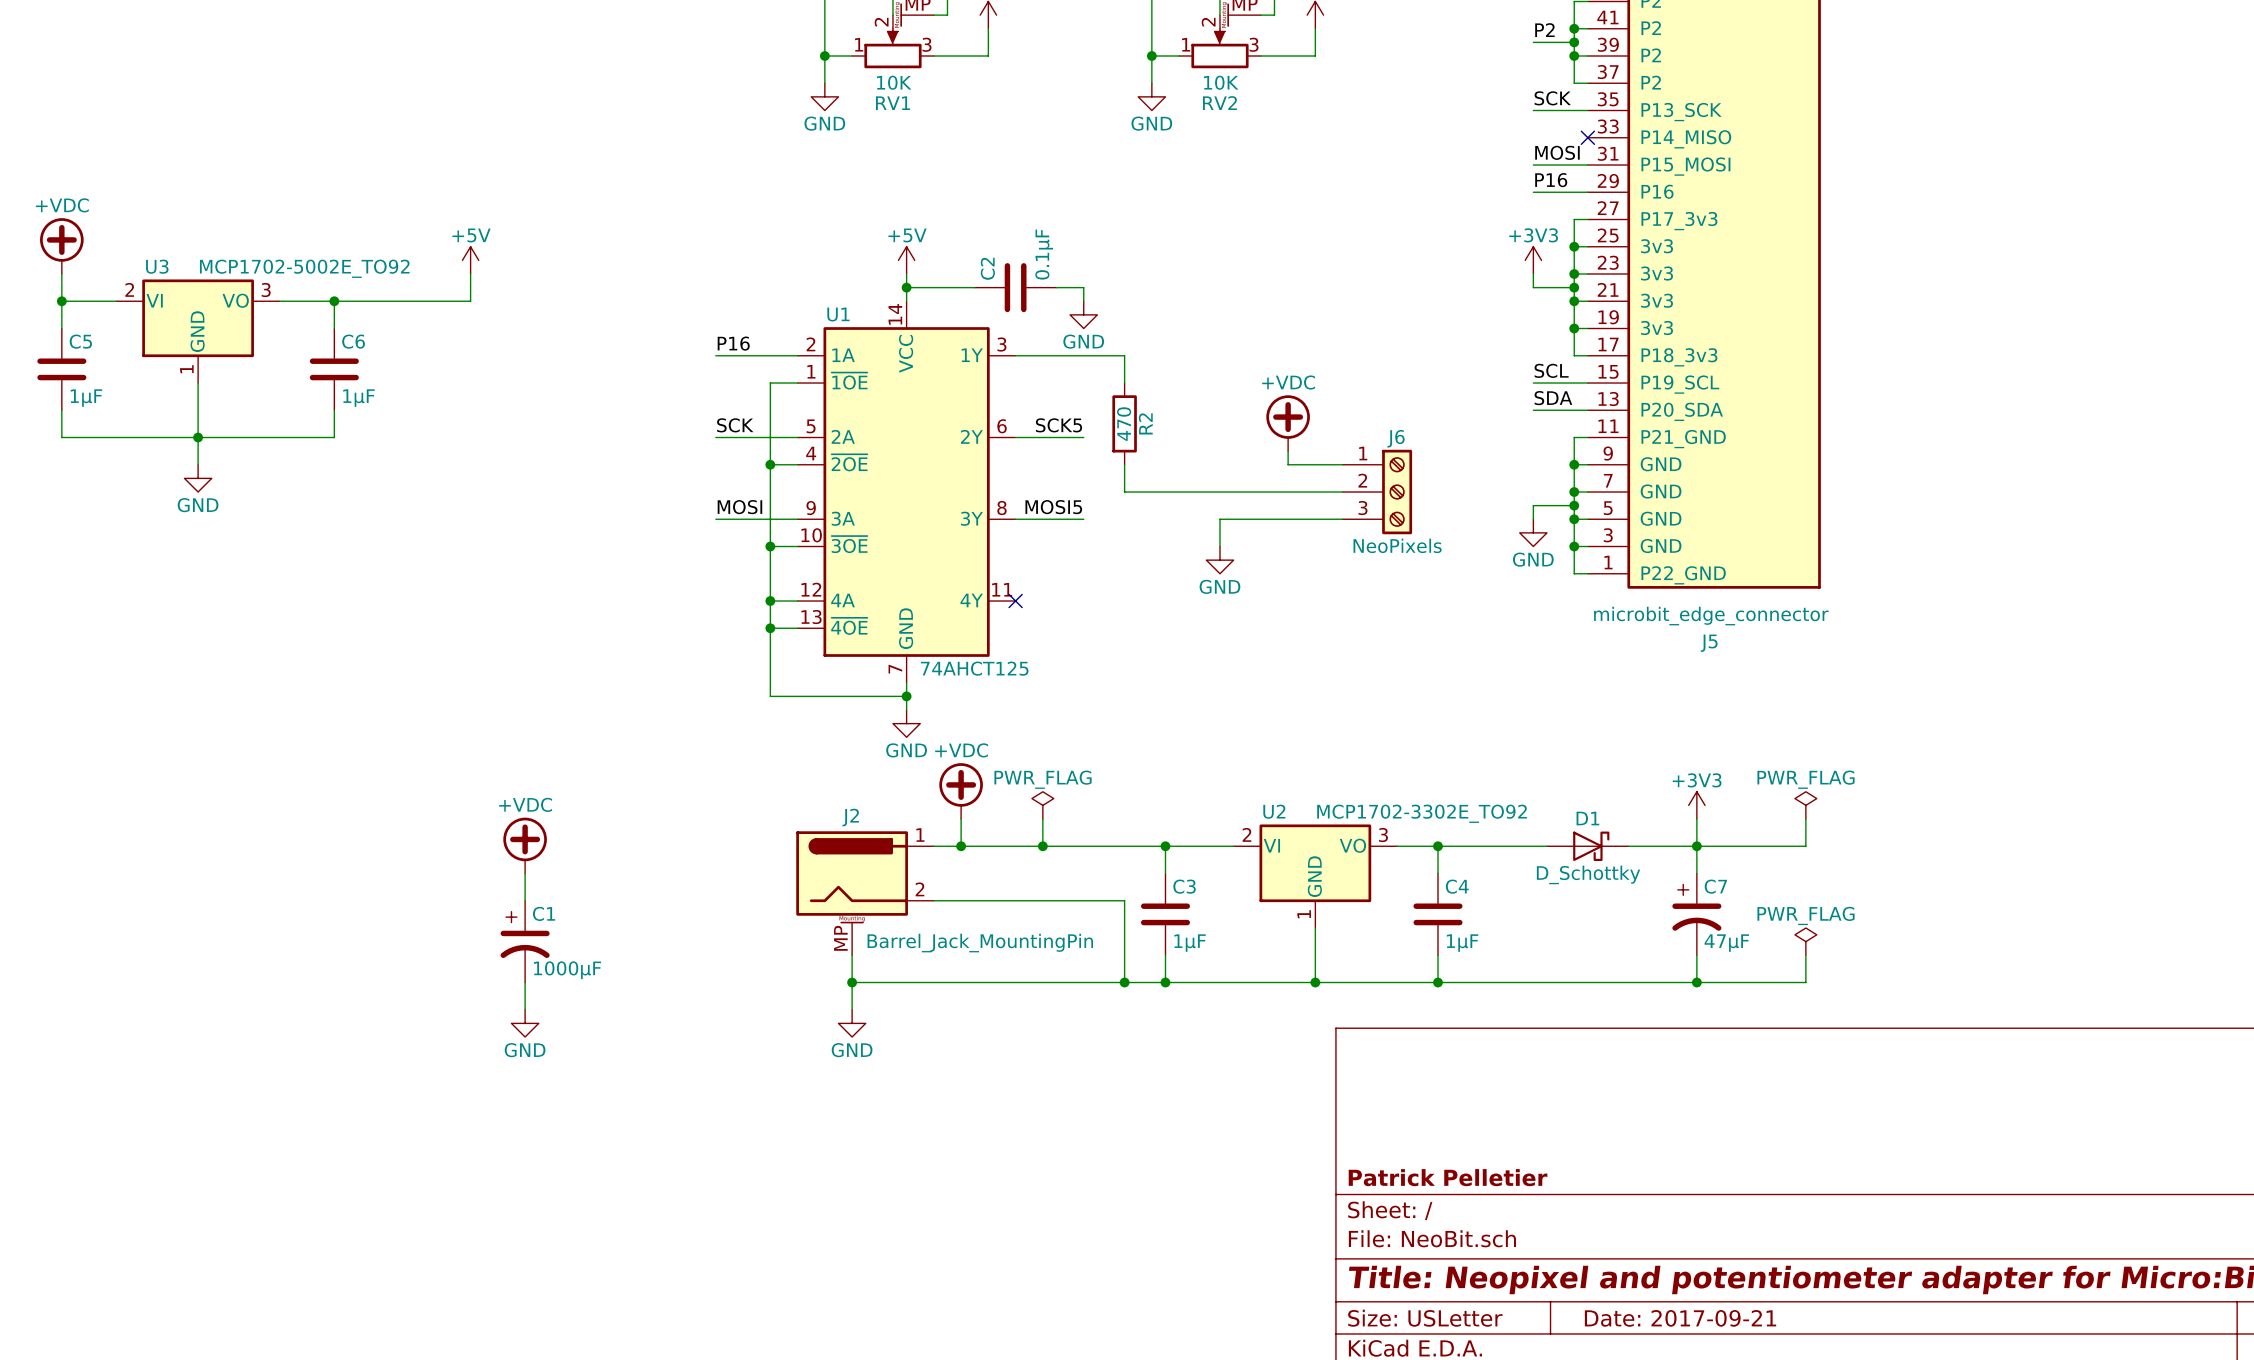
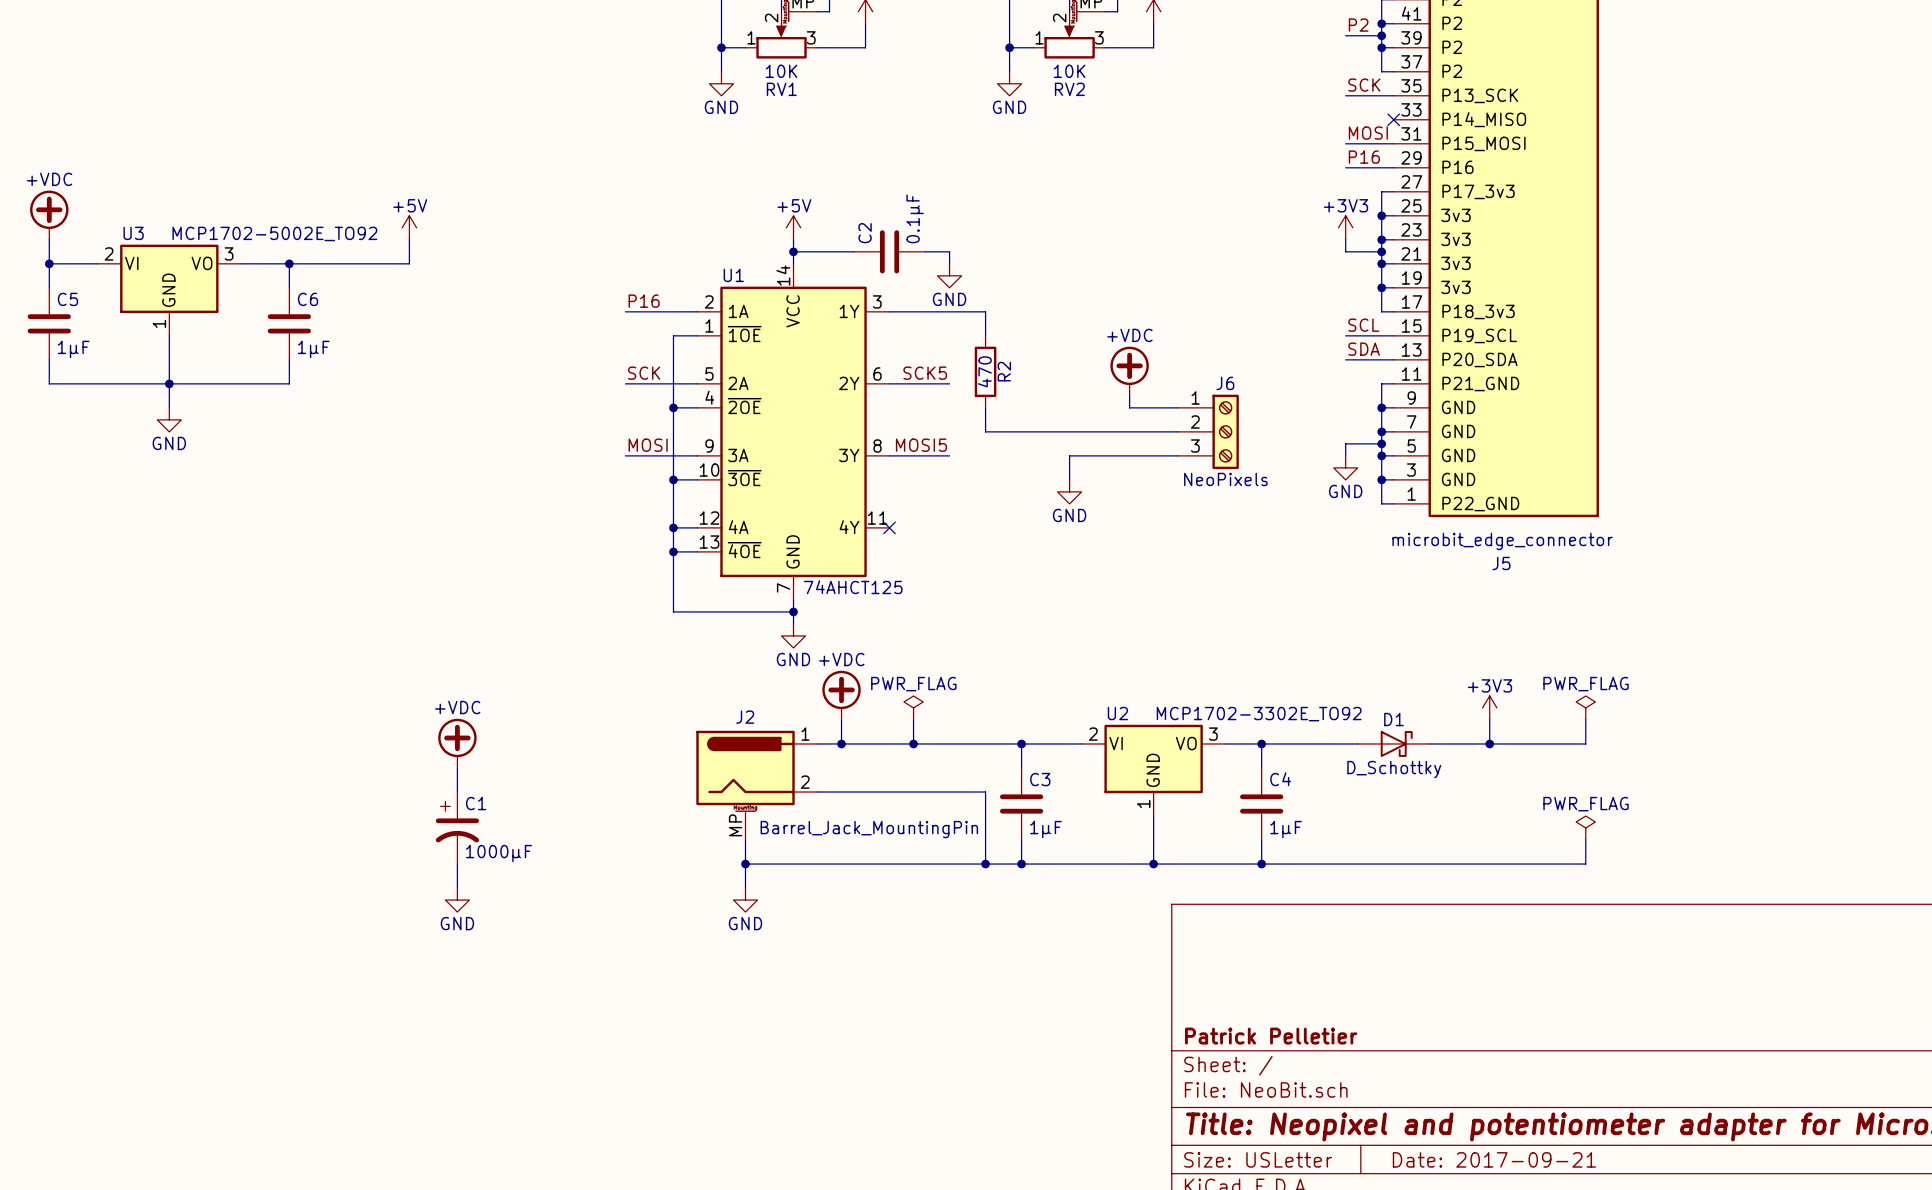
wire: (1696, 846) (1696, 873) -> none
C7: 47µF (1696, 914) -> none
wire: (1696, 955) (1696, 982) -> none
junction: (1696, 982) -> none

